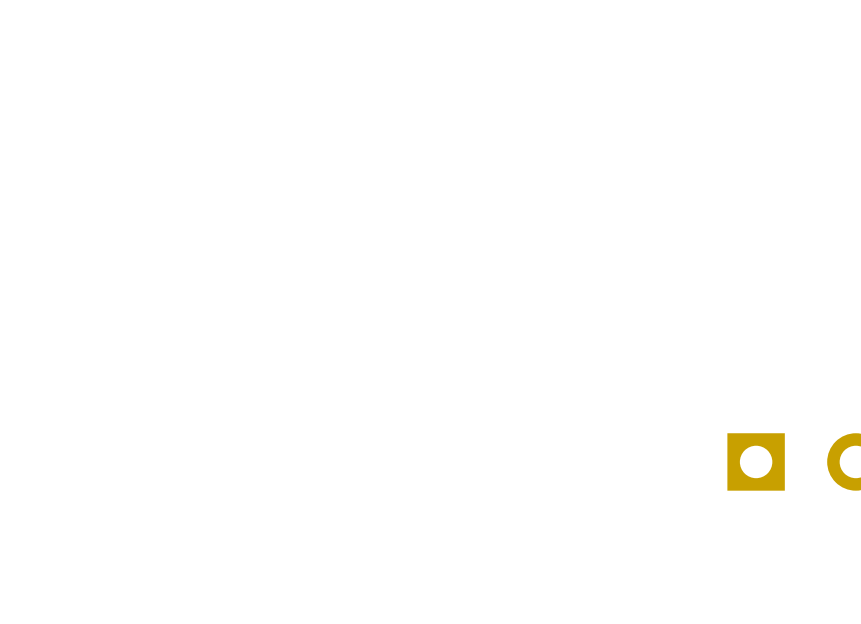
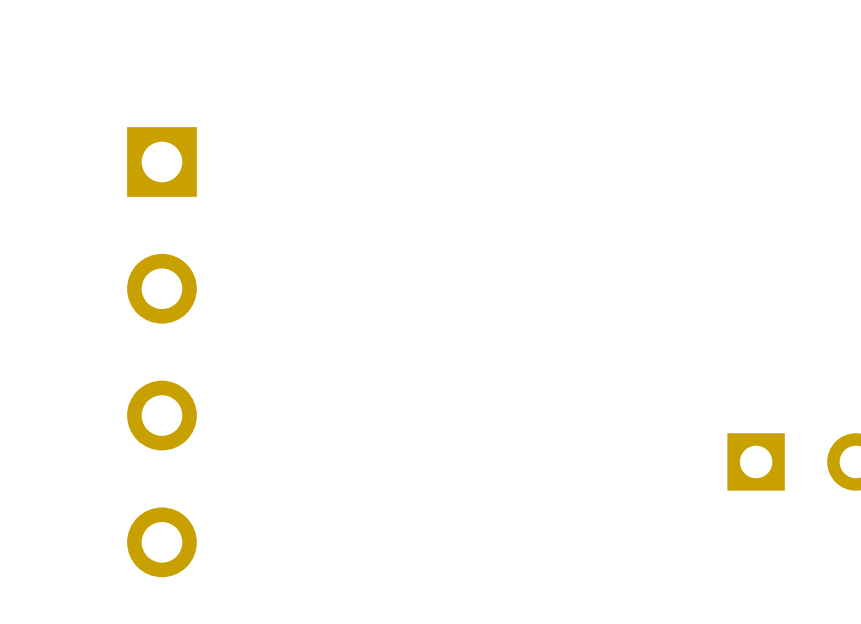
part: none -> (161, 352)

